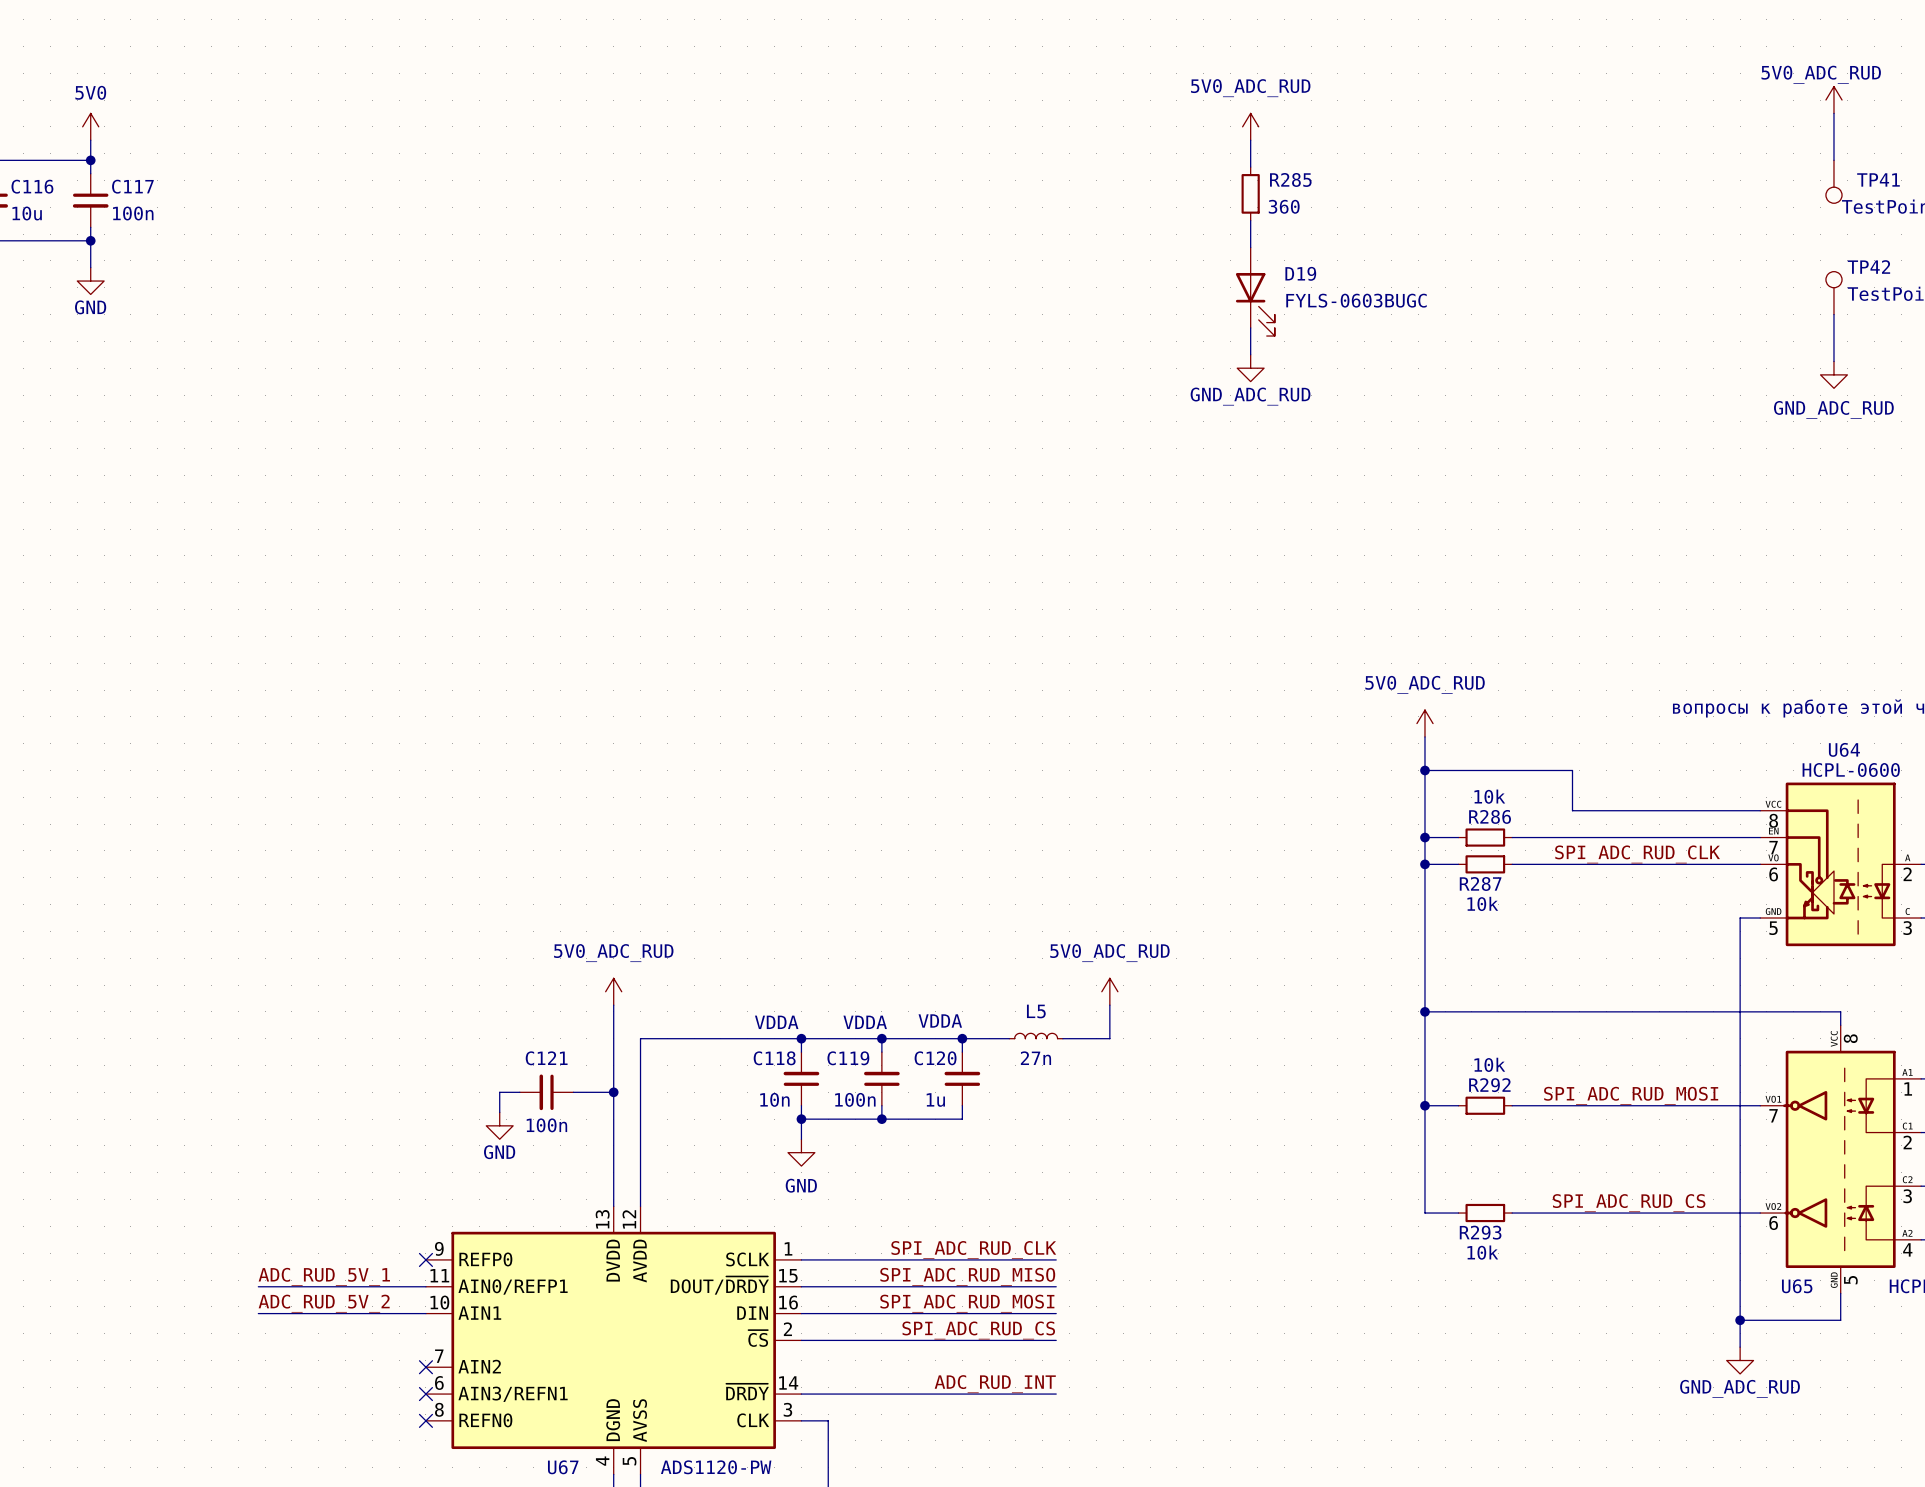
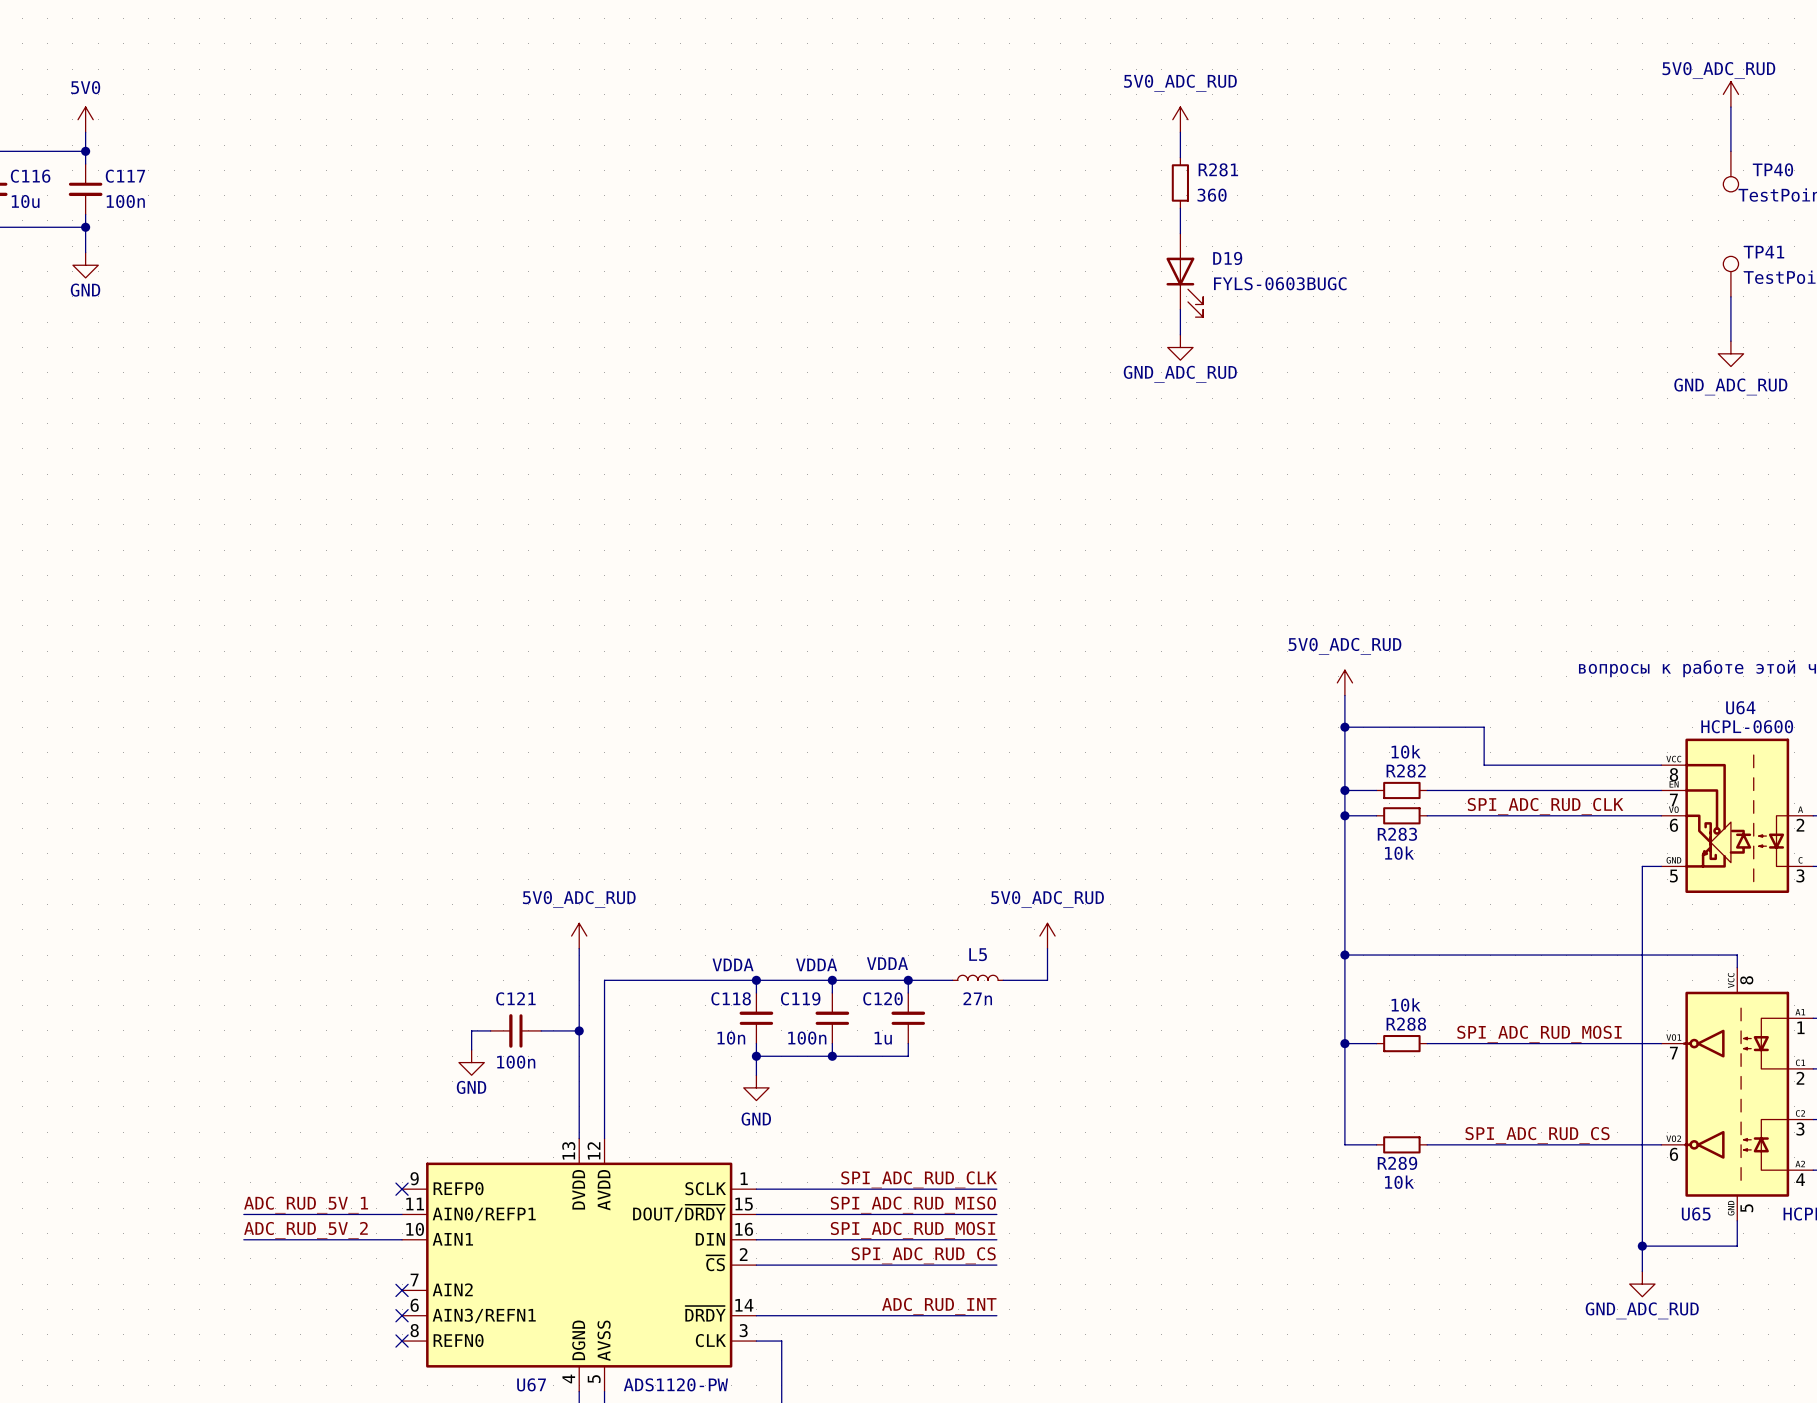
R285 name: R285 (1290, 179) -> R281 (1218, 169)
TP41 name: TP41 (1878, 179) -> TP40 (1772, 169)
TP42 name: TP42 (1868, 267) -> TP41 (1764, 252)
R286 name: R286 (1490, 816) -> R282 (1406, 771)
R287 name: R287 (1480, 883) -> R283 (1397, 834)
R292 name: R292 (1489, 1085) -> R288 (1406, 1024)
R293 name: R293 (1480, 1232) -> R289 (1397, 1163)

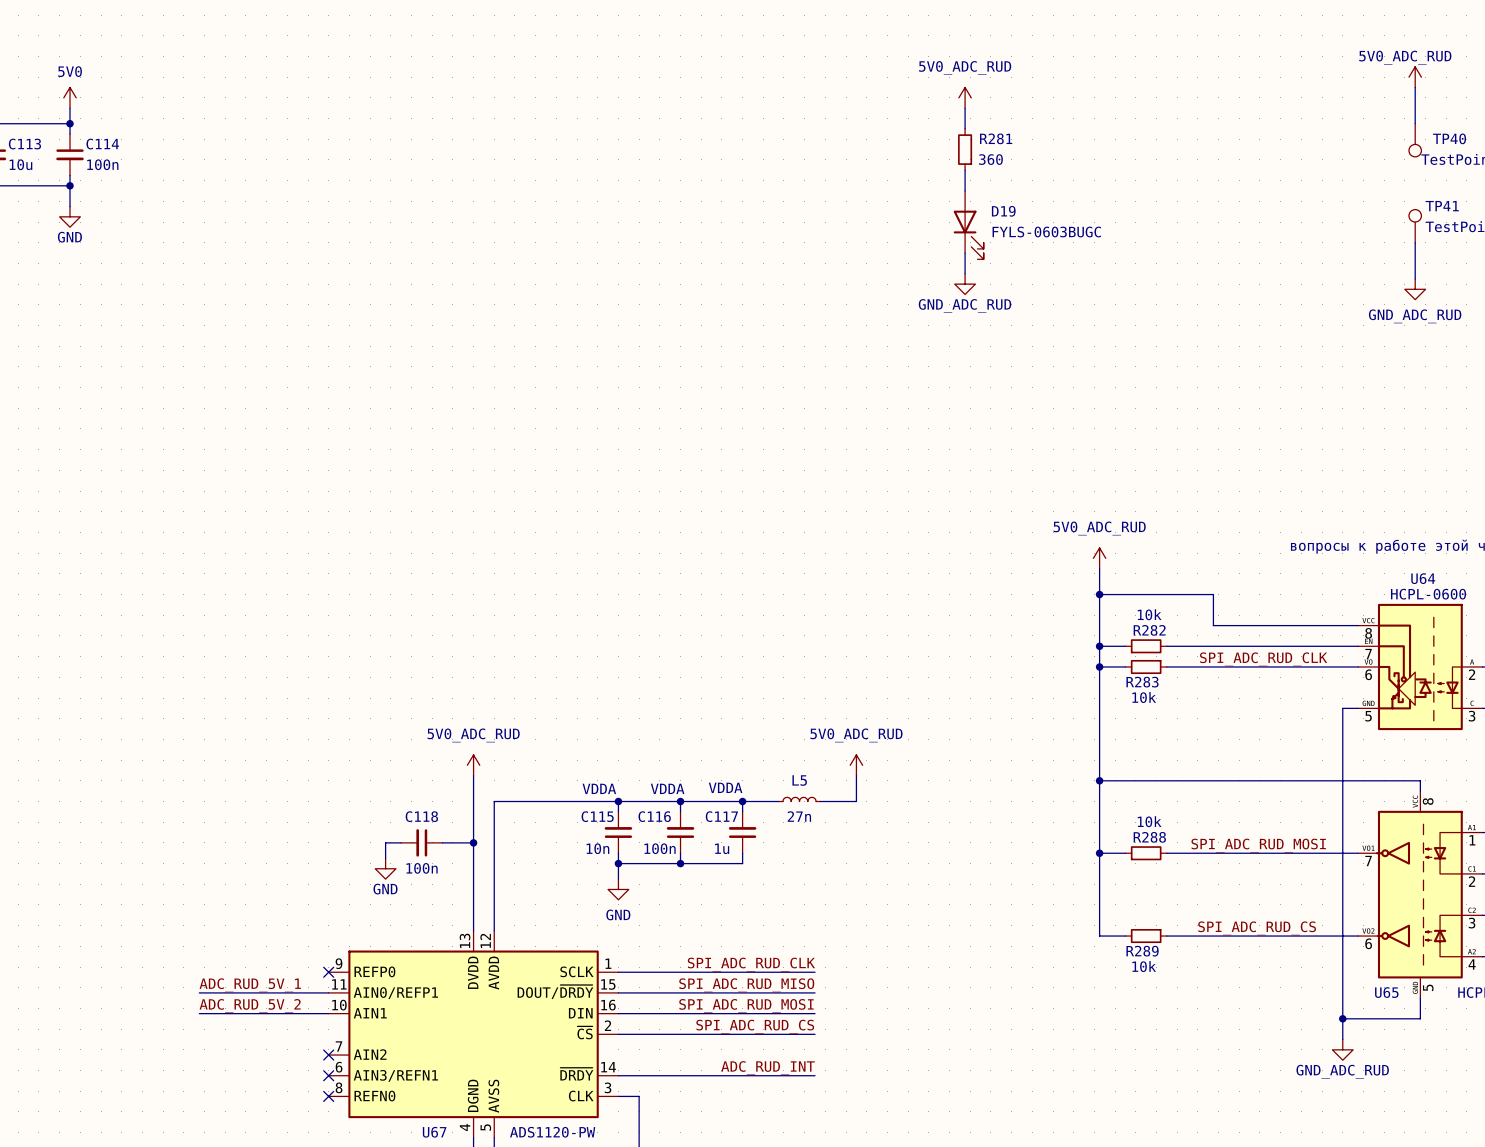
C116 name: C116 (30, 176) -> C113 (24, 144)
C117 name: C117 (125, 176) -> C114 (102, 144)
C121 name: C121 (515, 998) -> C118 (421, 816)
C118 name: C118 (731, 998) -> C115 (597, 816)
C119 name: C119 (800, 998) -> C116 (654, 816)
C120 name: C120 (882, 998) -> C117 (721, 816)

